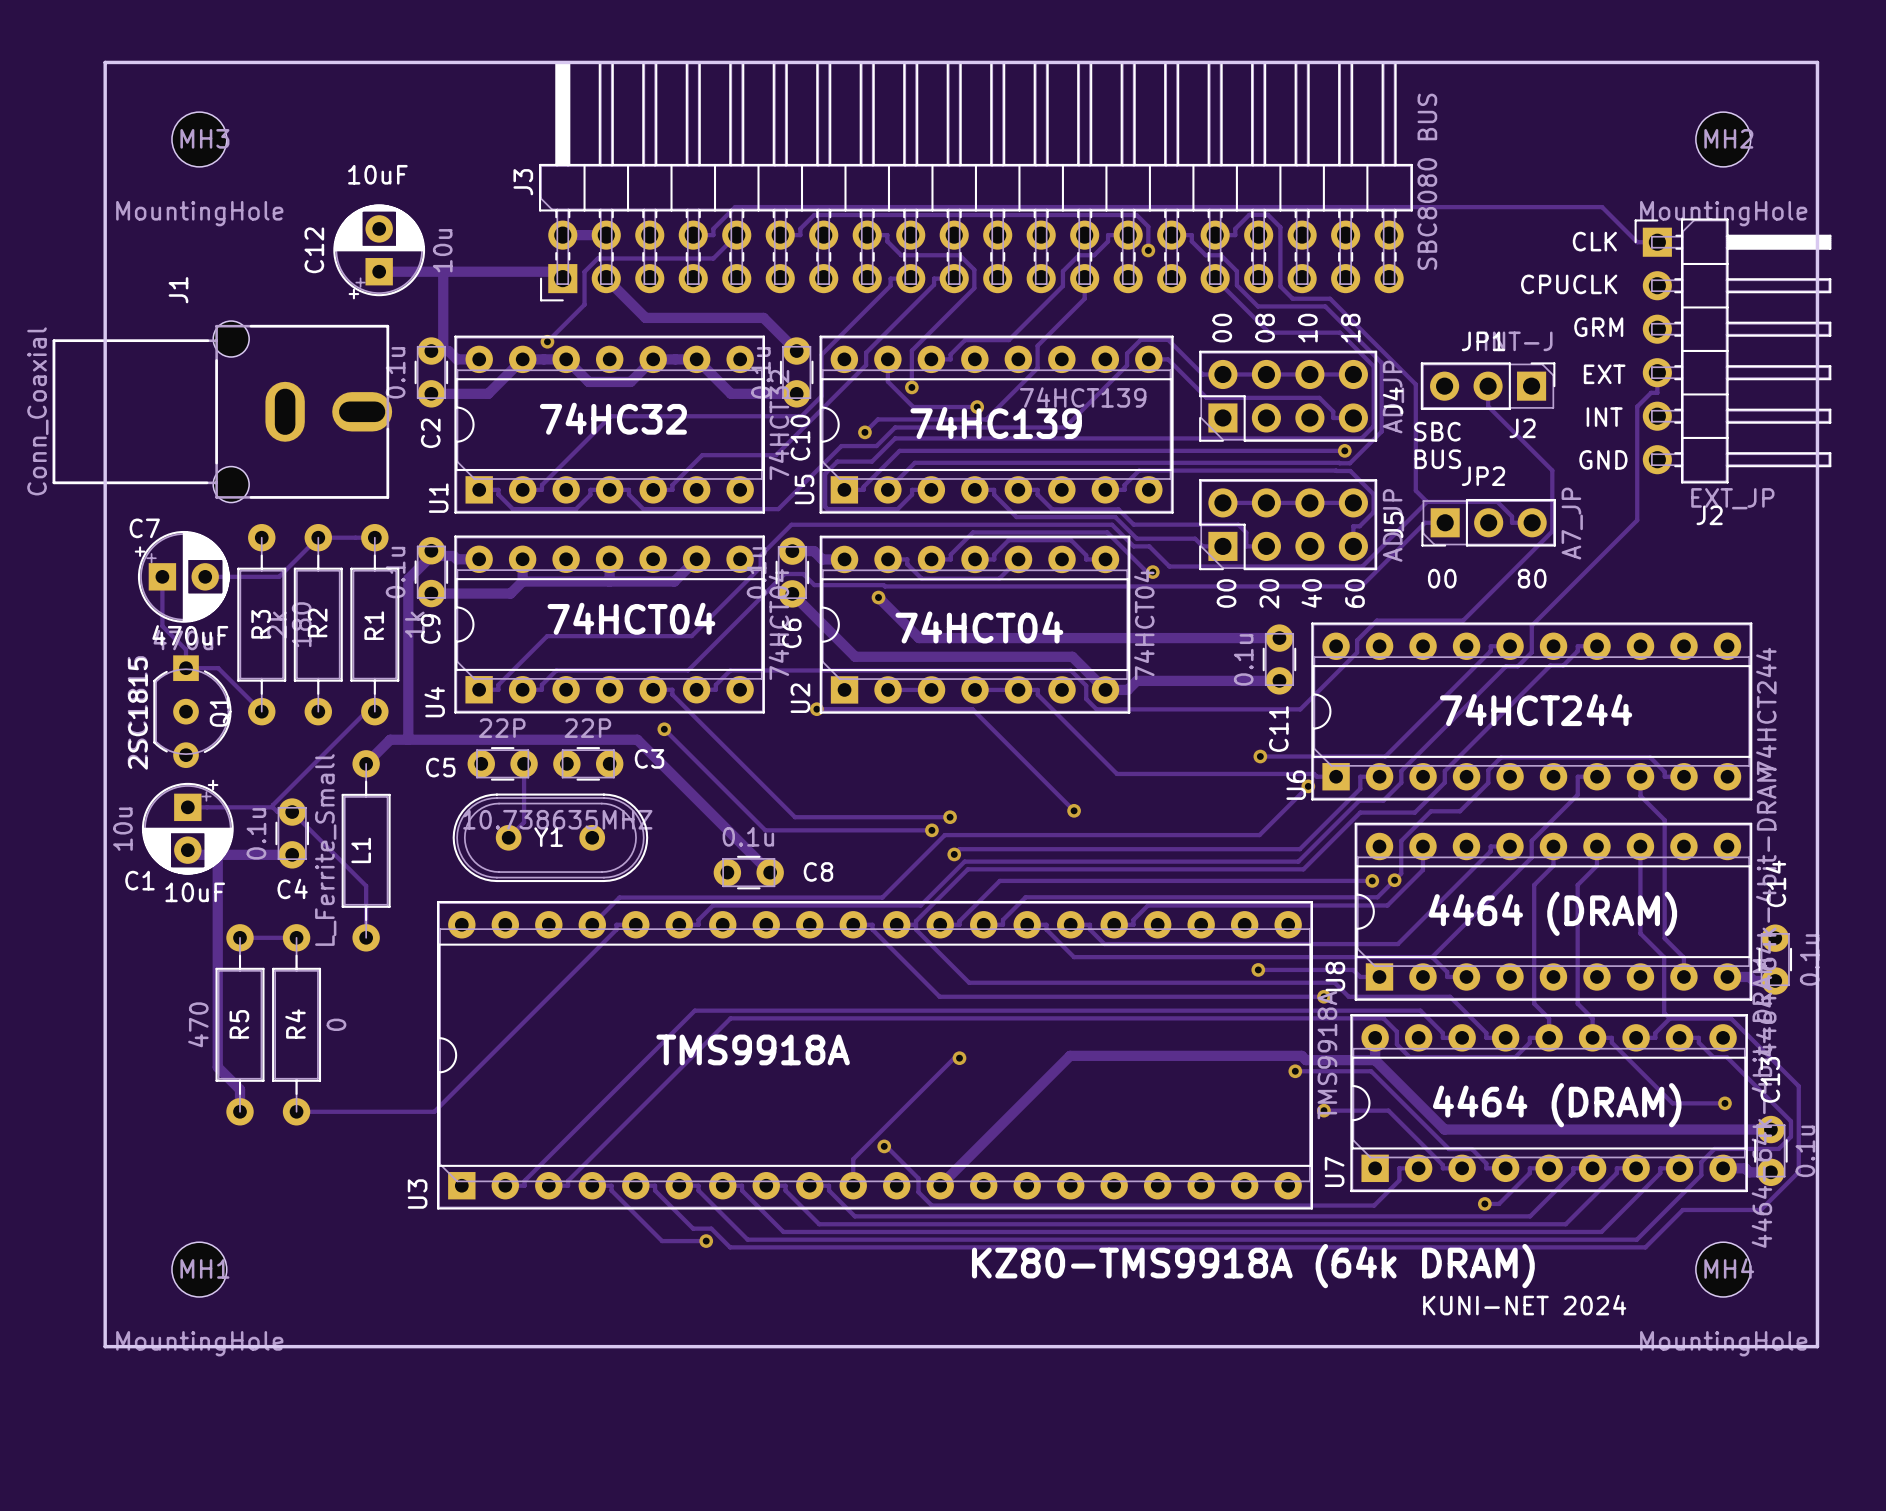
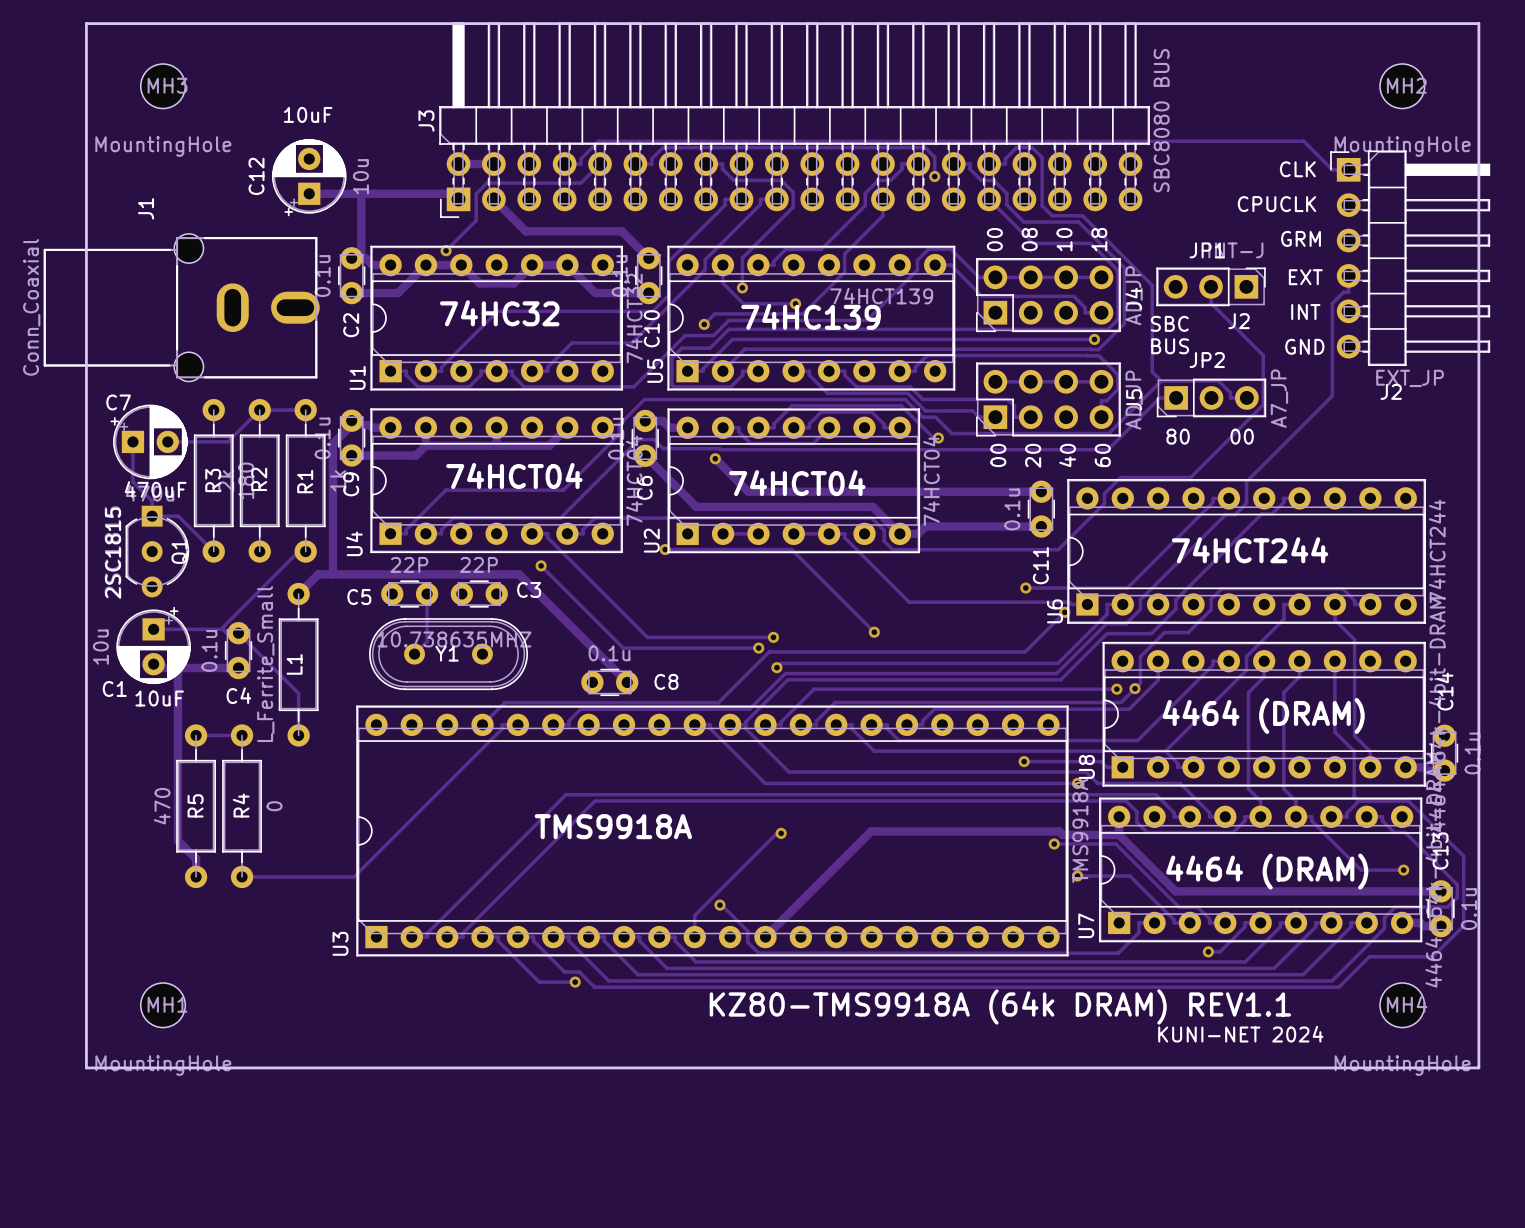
text: 00 (1442, 578) -> 80 (1178, 436)
text: 80 (1532, 578) -> 00 (1242, 436)
text: KZ80-TMS9918A (64k DRAM) (1253, 1266) -> KZ80-TMS9918A (64k DRAM) REV1.1 (1000, 1006)

